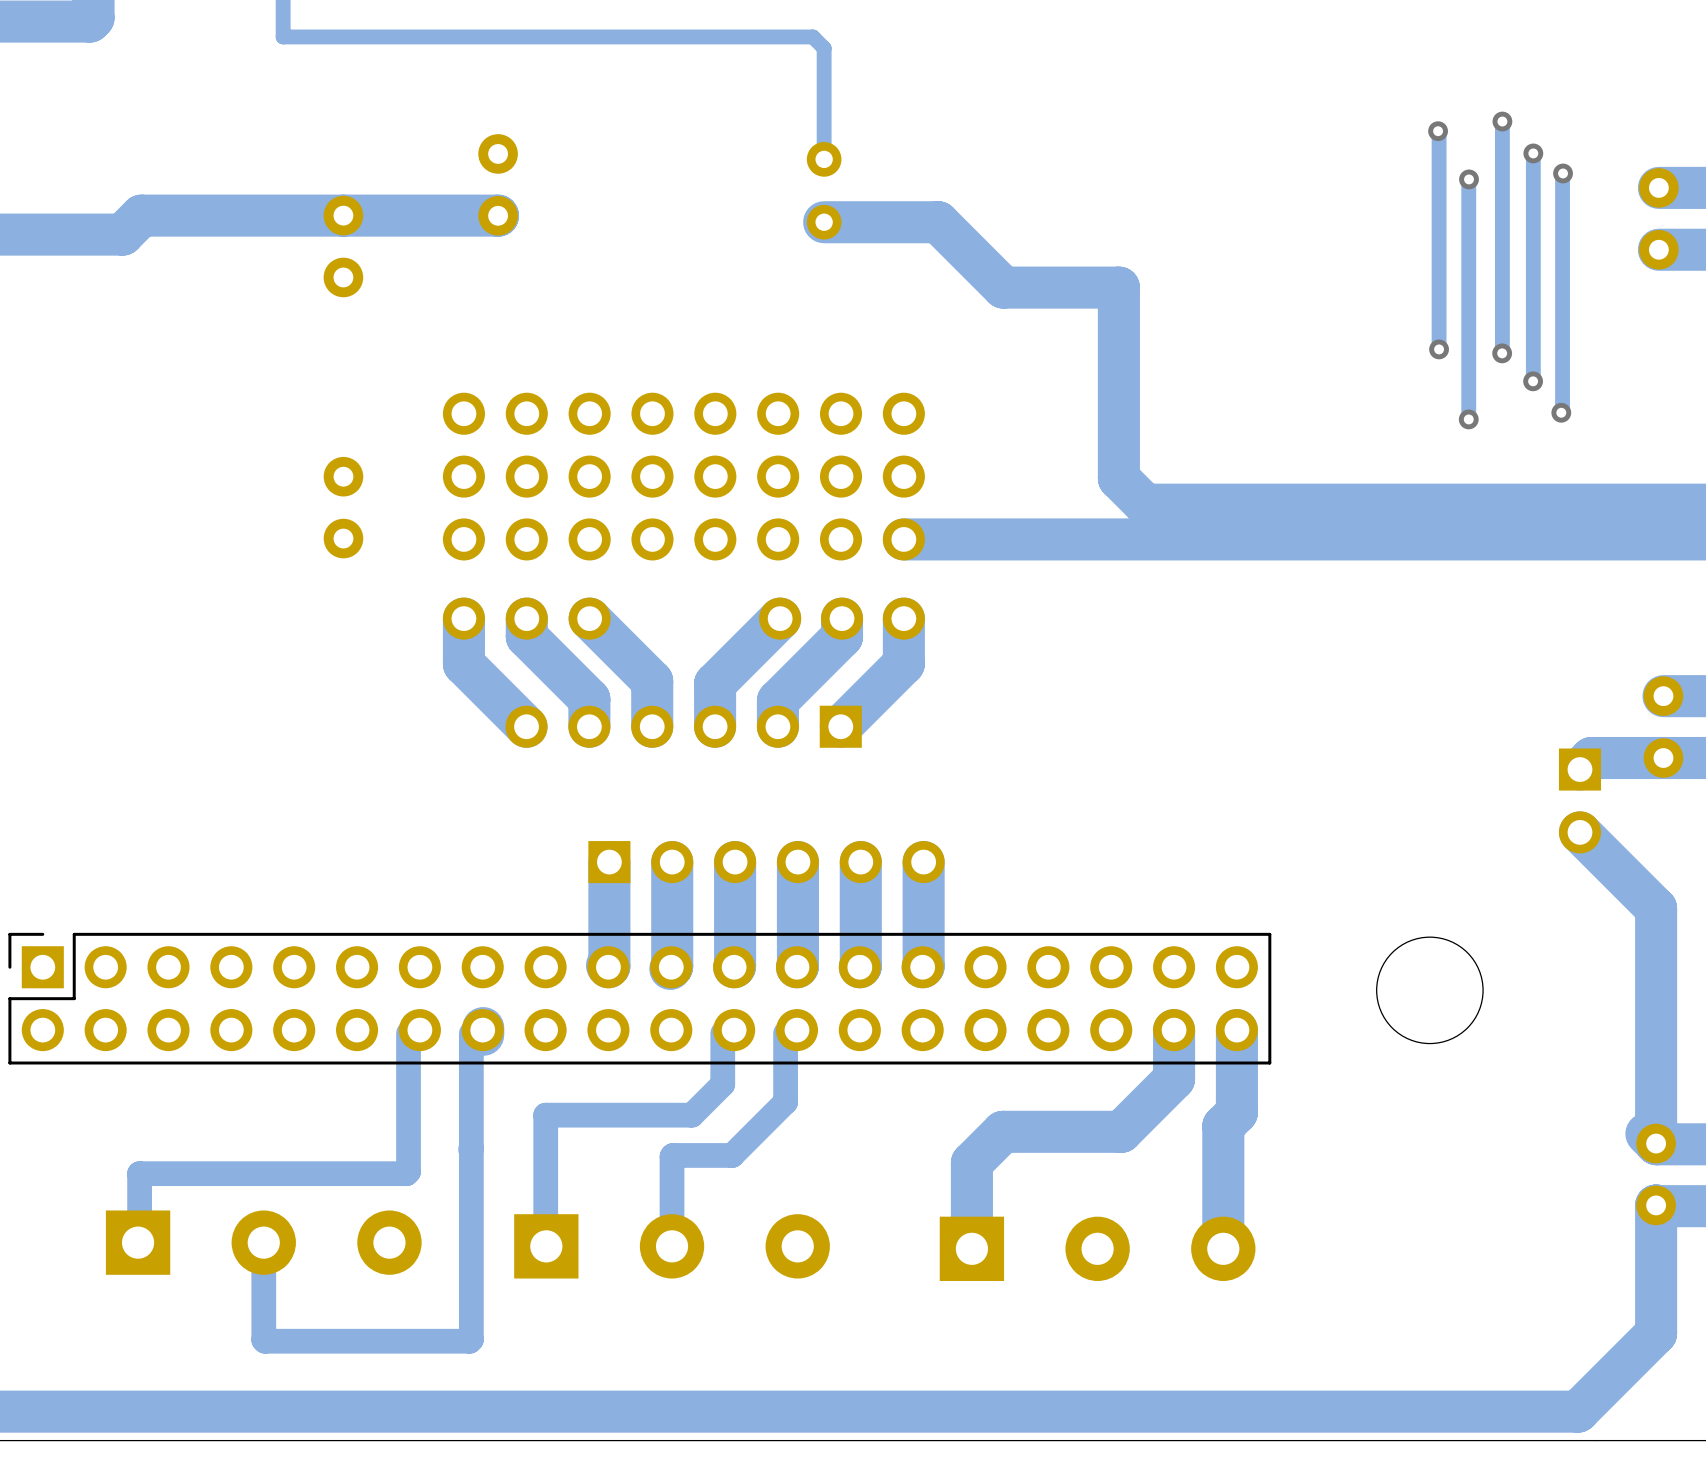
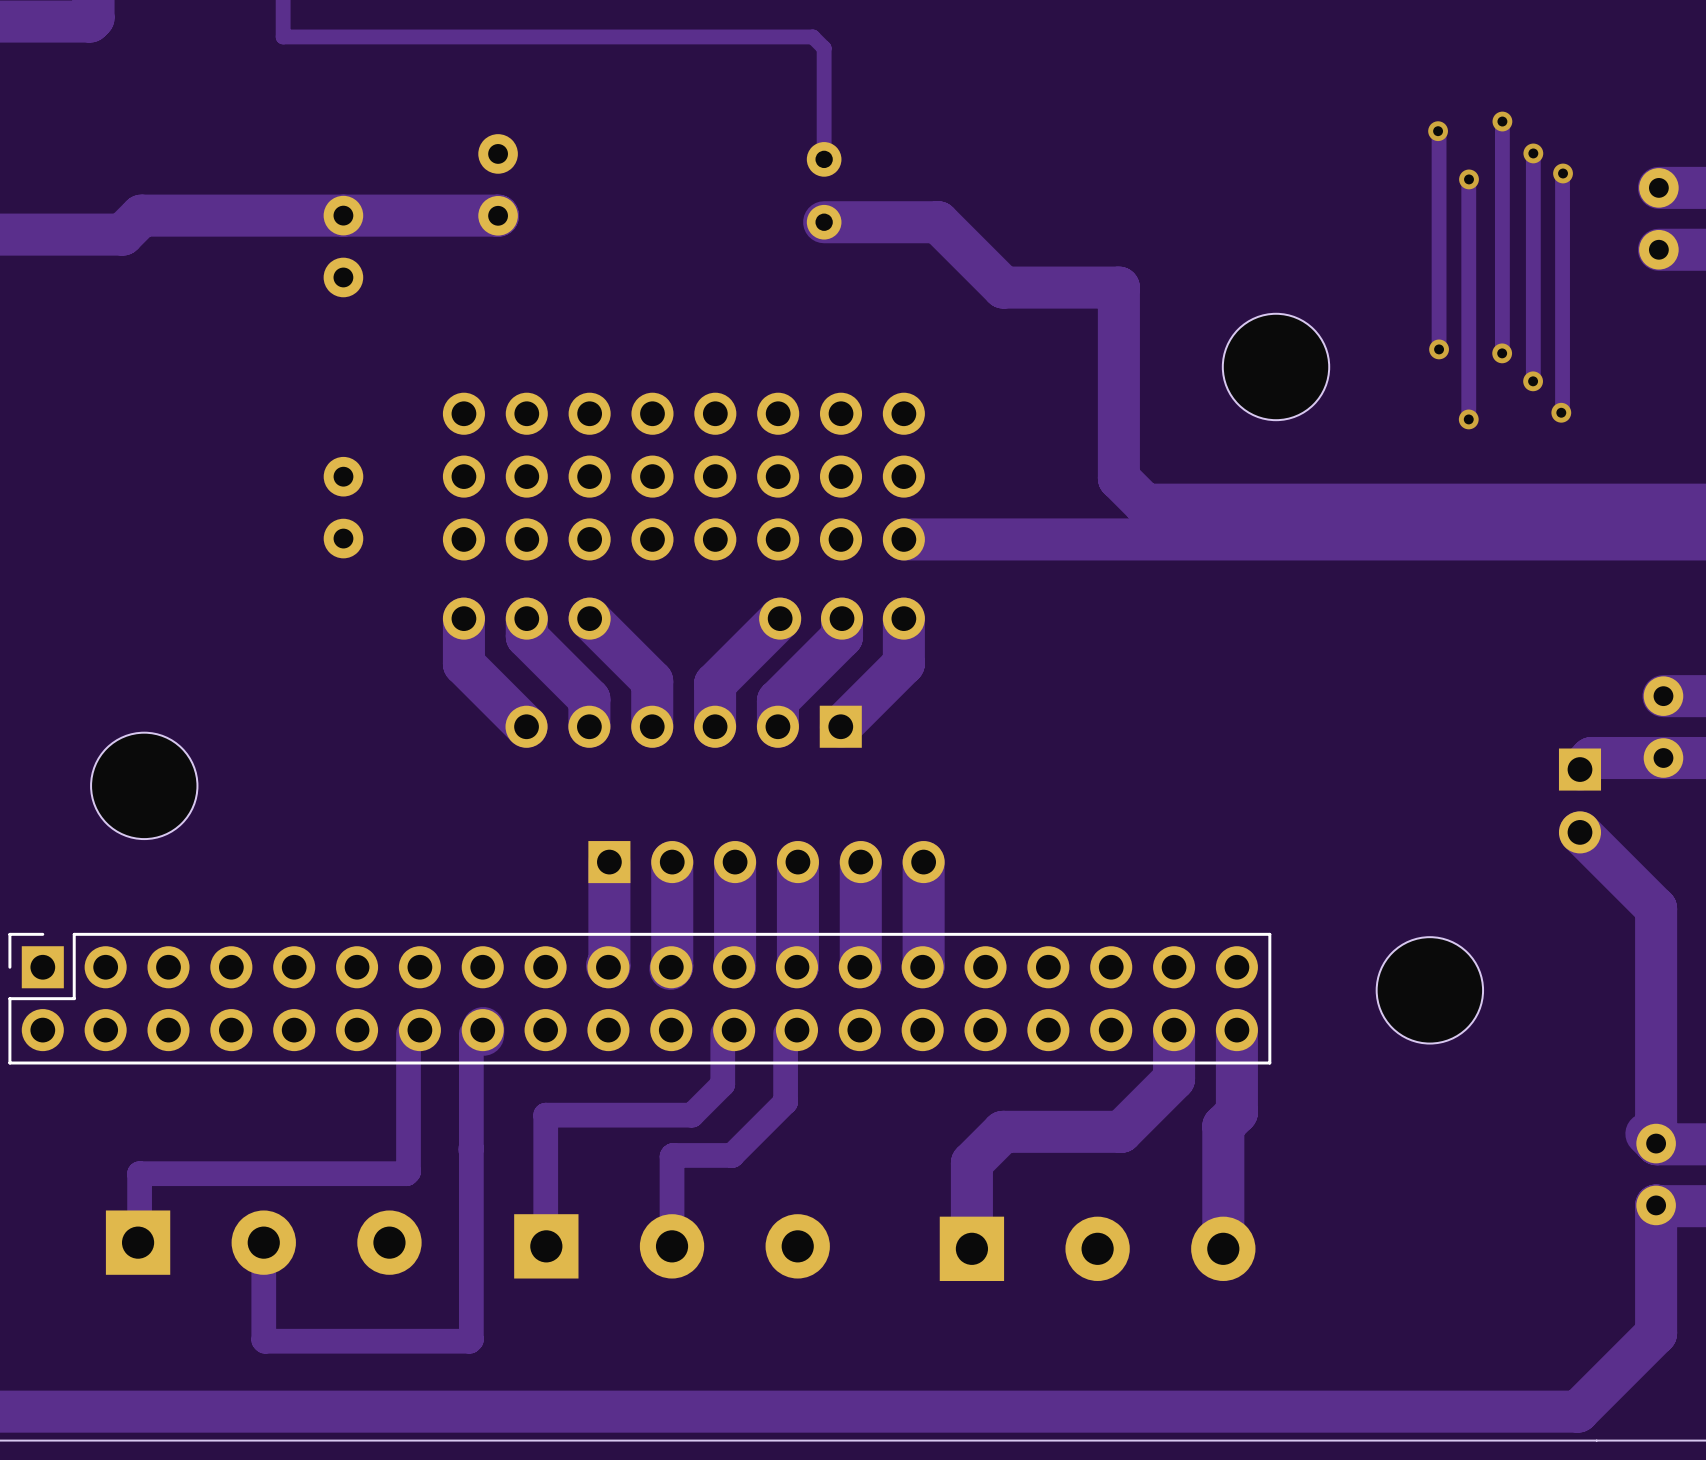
part: none -> (1276, 366)
part: none -> (144, 785)

